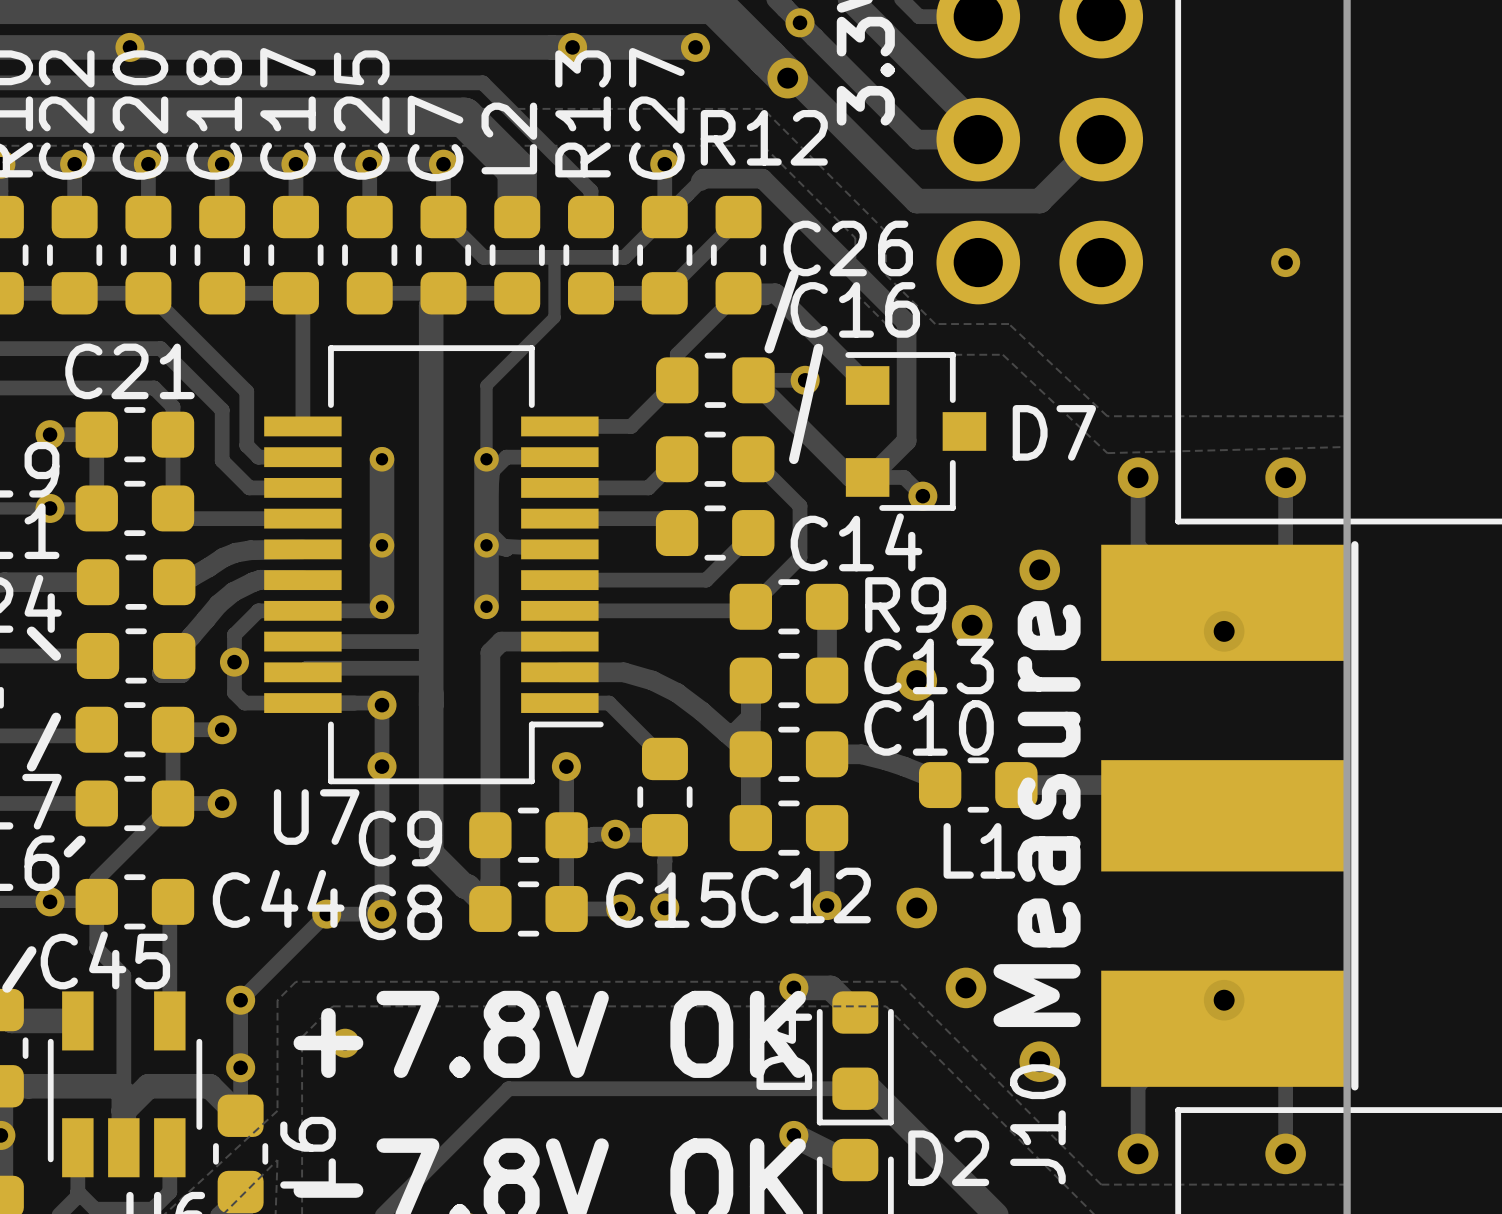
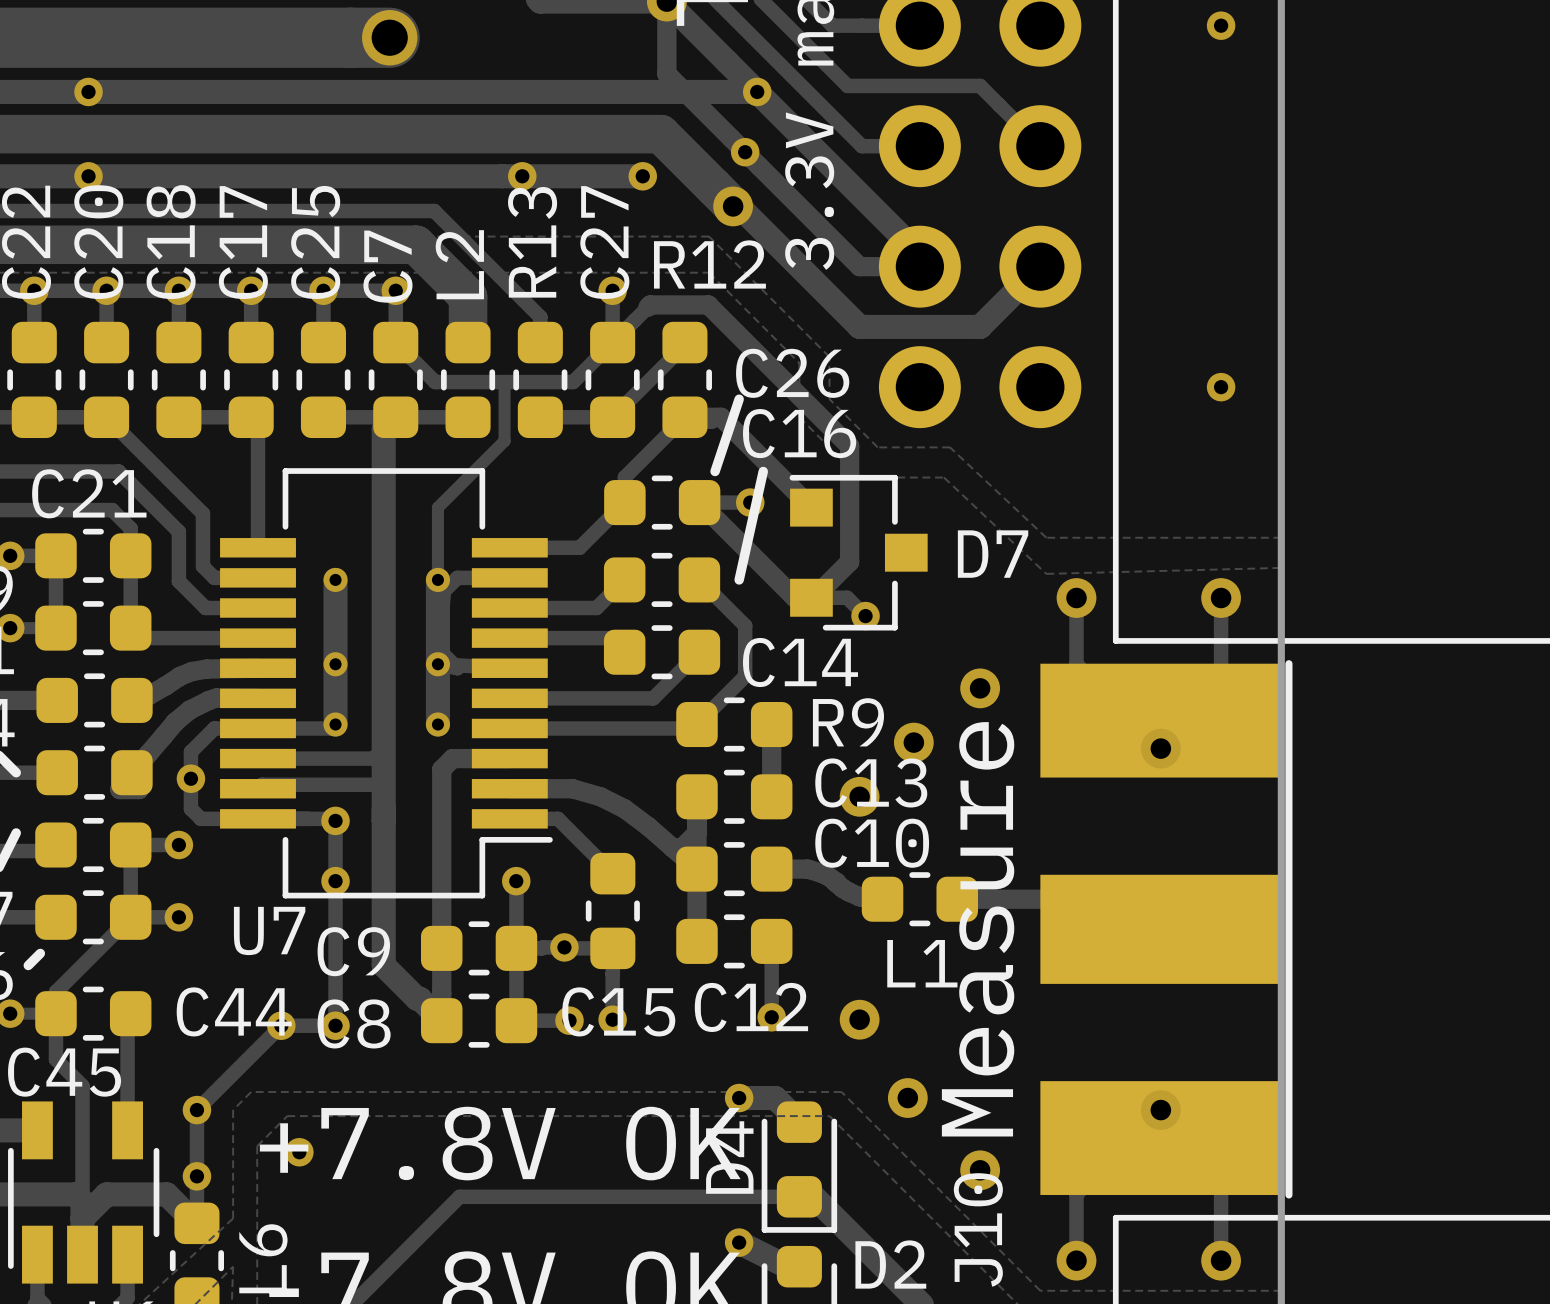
track: (861, 754) (886, 760) (935, 778) -> (805, 869) (828, 876) (842, 888) (859, 896) (889, 899)

